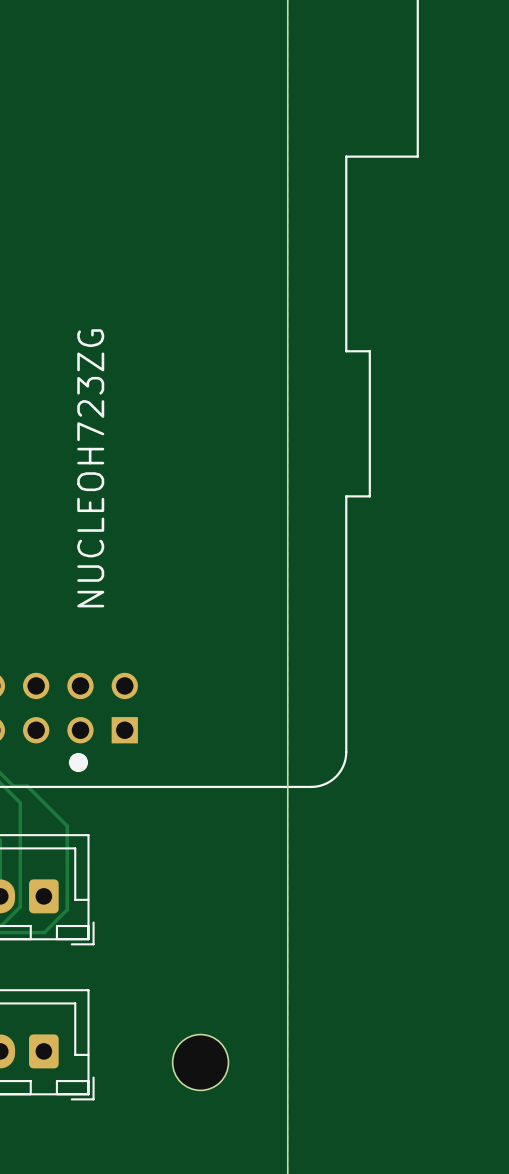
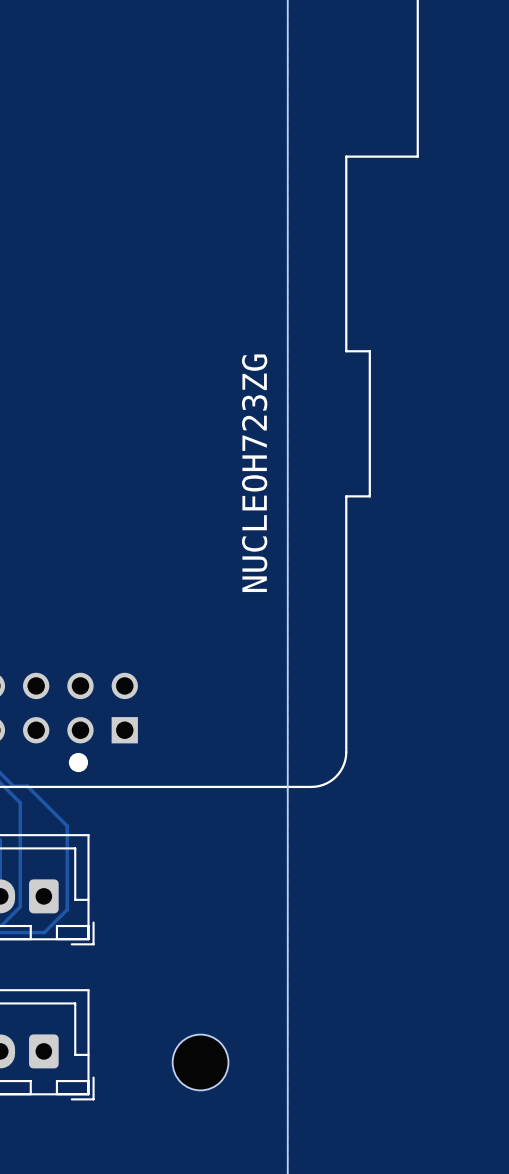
part value position: NUCLEOH723ZG (90, 468) -> NUCLEOH723ZG (254, 473)

